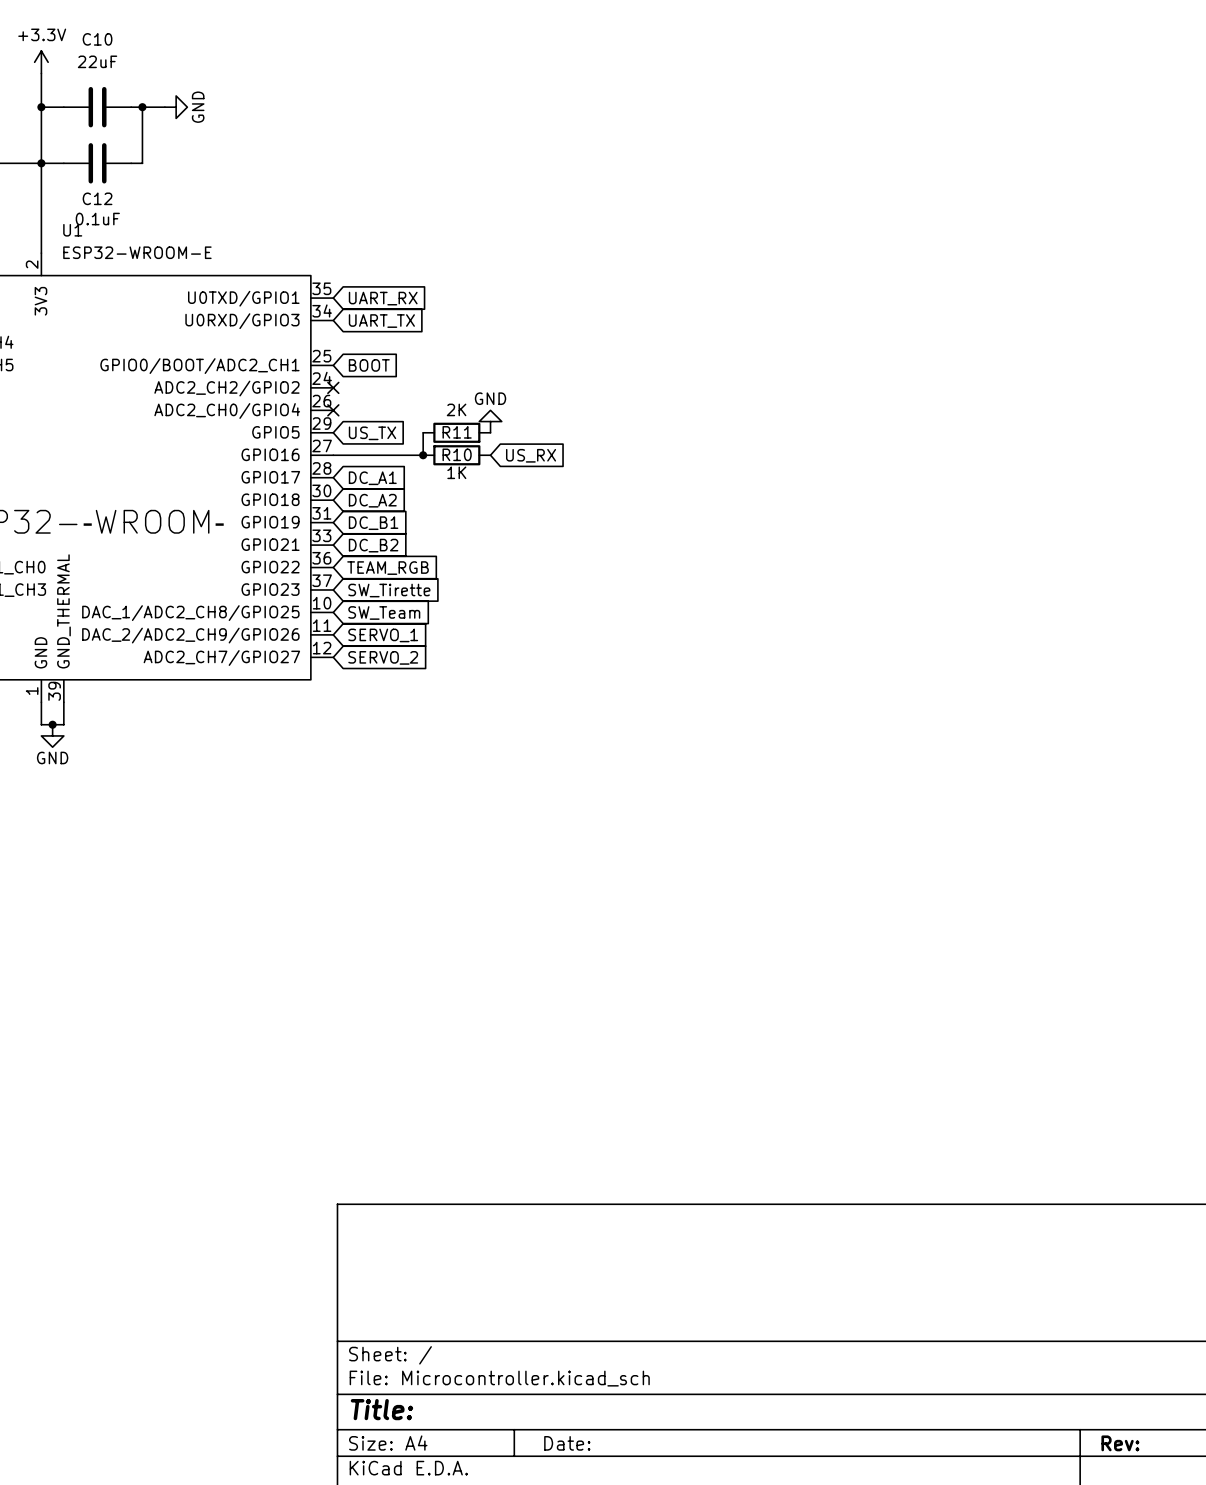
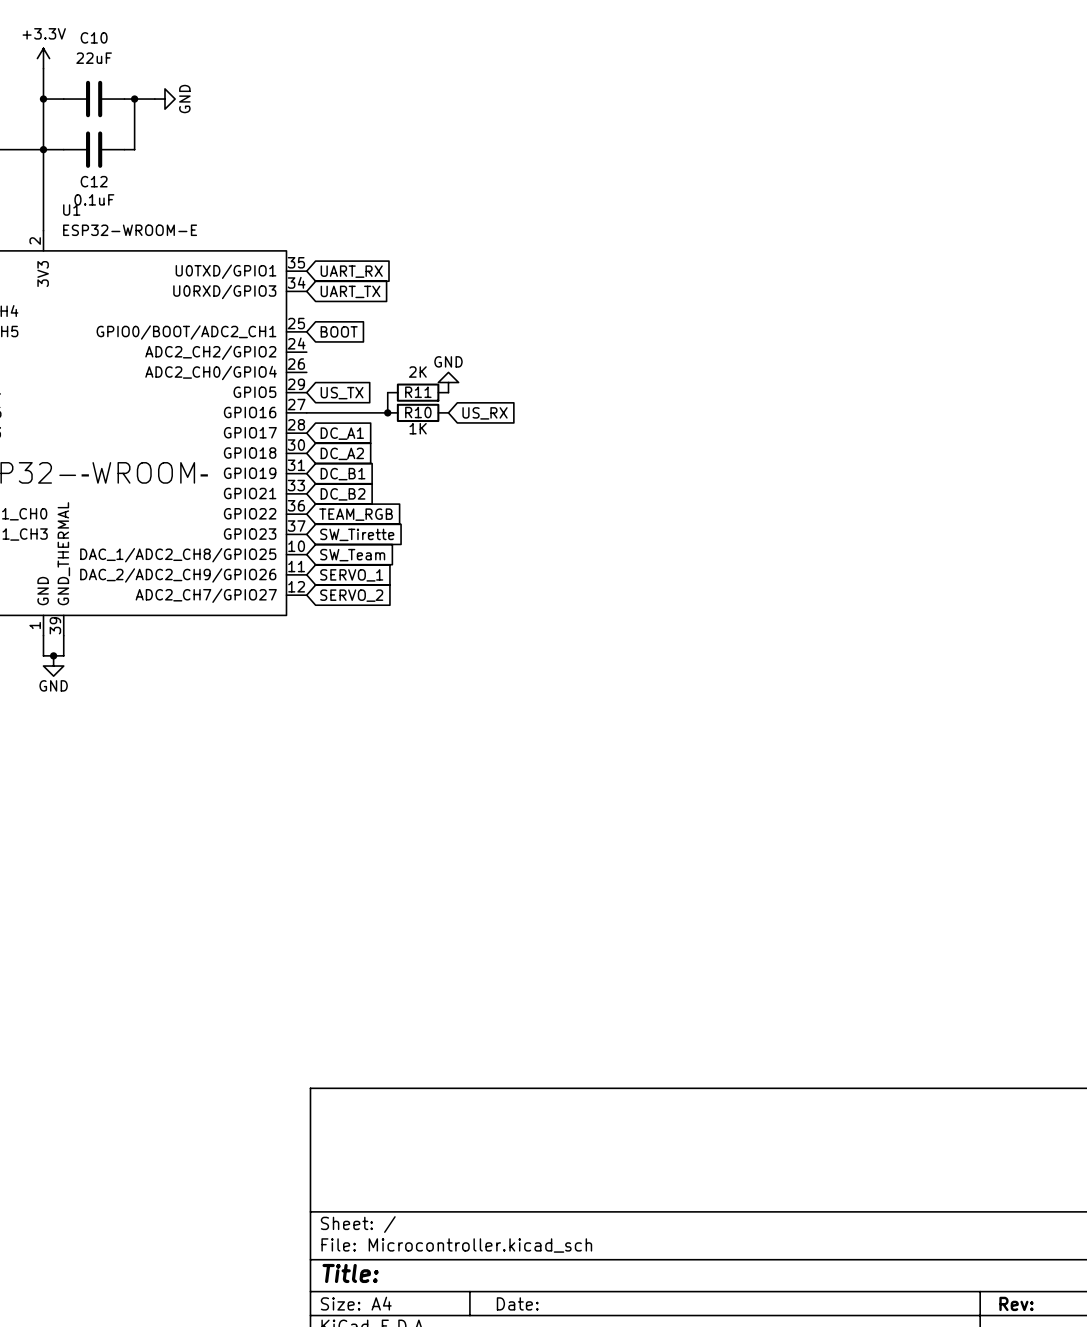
no-connect mark: (333, 387) -> none
no-connect mark: (333, 410) -> none

